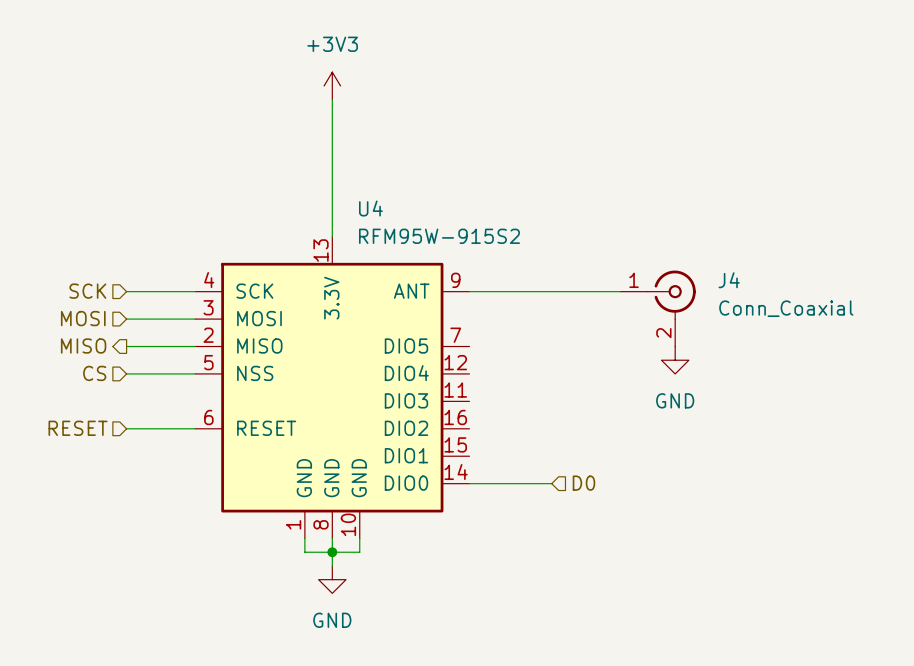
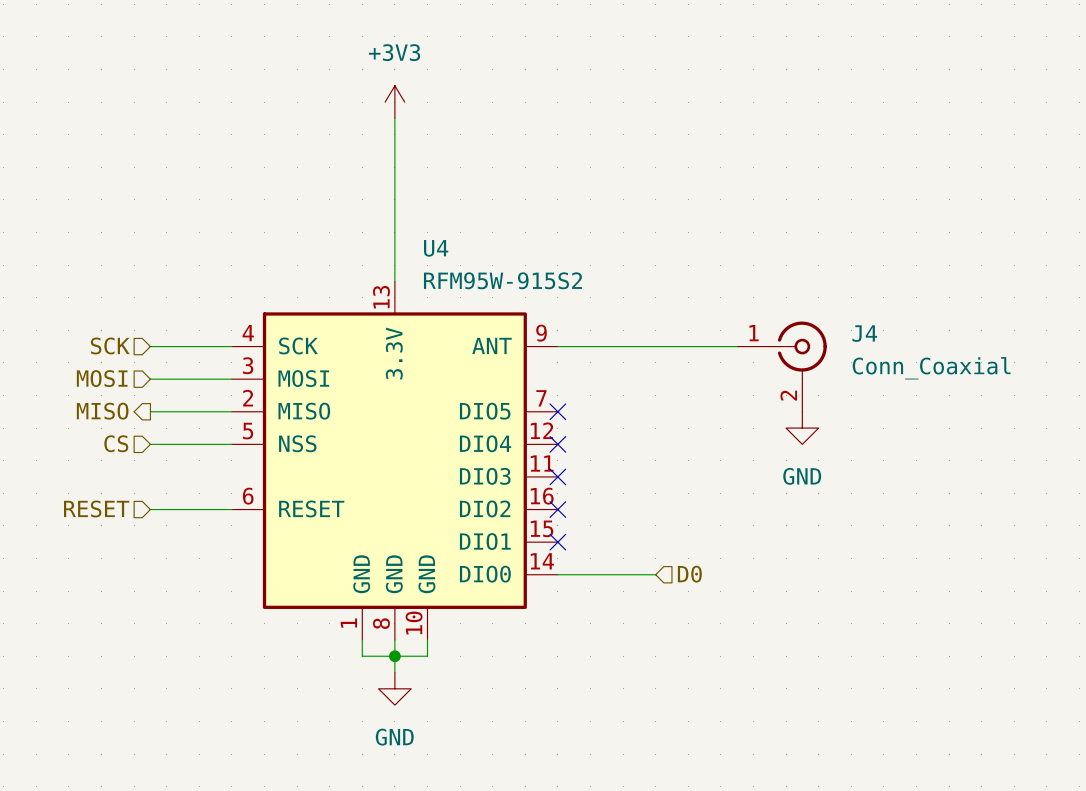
no-connect mark: none -> (557, 411)
no-connect mark: none -> (557, 444)
no-connect mark: none -> (557, 476)
no-connect mark: none -> (557, 509)
no-connect mark: none -> (557, 542)

